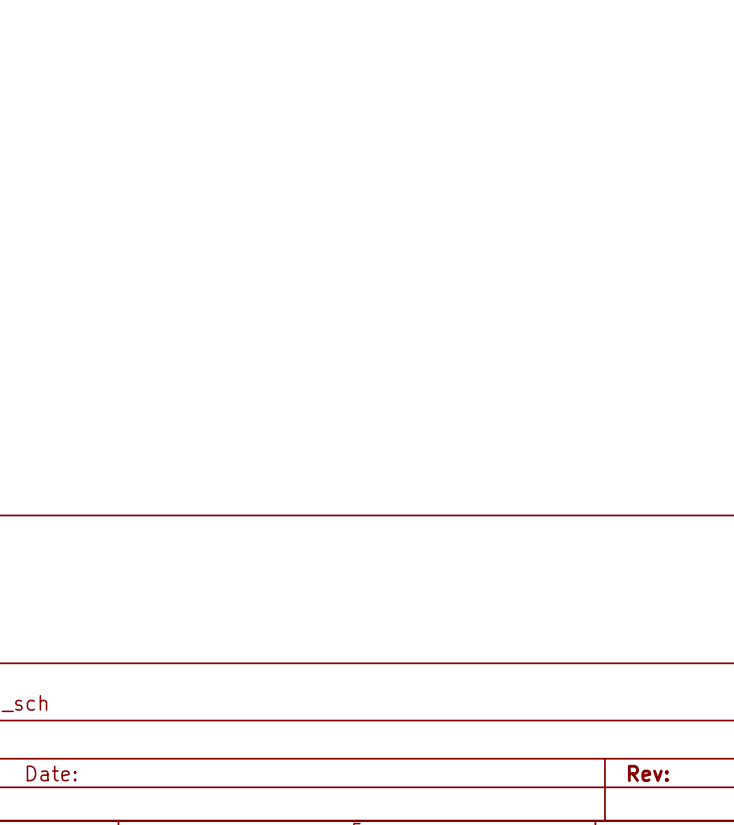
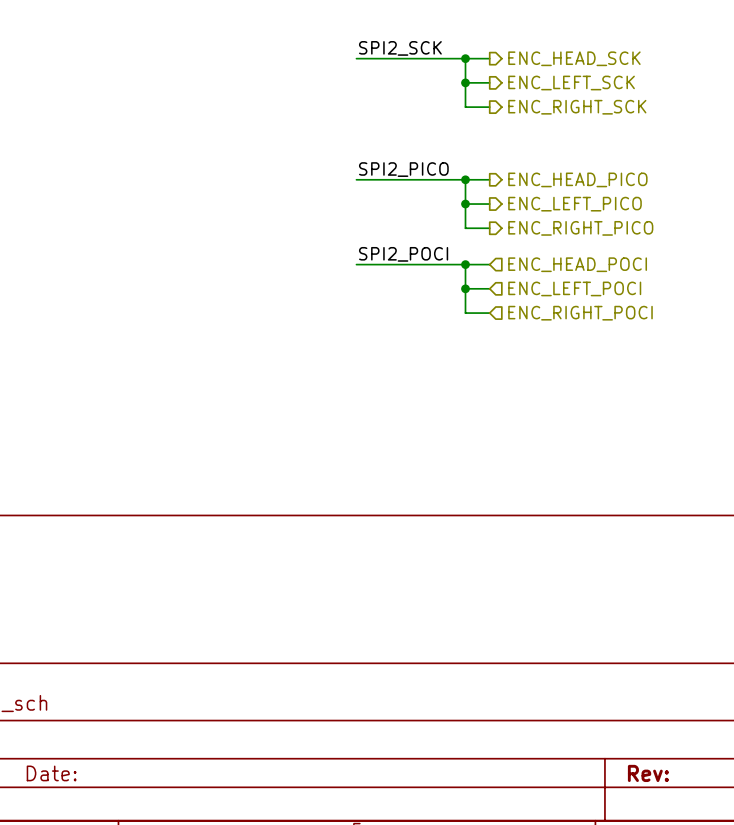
label: none -> SPI2_SCK (400, 48)
wire: none -> (356, 58) (489, 58)
wire: none -> (465, 58) (465, 107) (489, 107)
junction: none -> (465, 58)
hierarchical label: none -> ENC_HEAD_SCK (574, 58)
wire: none -> (465, 82) (489, 82)
junction: none -> (465, 82)
hierarchical label: none -> ENC_LEFT_SCK (571, 83)
hierarchical label: none -> ENC_RIGHT_SCK (577, 107)
label: none -> SPI2_PICO (403, 169)
wire: none -> (356, 179) (489, 179)
wire: none -> (465, 179) (465, 228) (489, 228)
junction: none -> (465, 179)
hierarchical label: none -> ENC_HEAD_PICO (577, 179)
wire: none -> (465, 204) (489, 204)
junction: none -> (465, 204)
hierarchical label: none -> ENC_LEFT_PICO (575, 204)
hierarchical label: none -> ENC_RIGHT_PICO (580, 228)
label: none -> SPI2_POCI (403, 254)
wire: none -> (356, 264) (489, 264)
wire: none -> (465, 264) (465, 313) (489, 313)
junction: none -> (465, 264)
hierarchical label: none -> ENC_HEAD_POCI (577, 264)
wire: none -> (465, 288) (489, 288)
junction: none -> (465, 288)
hierarchical label: none -> ENC_LEFT_POCI (574, 288)
hierarchical label: none -> ENC_RIGHT_POCI (580, 313)

